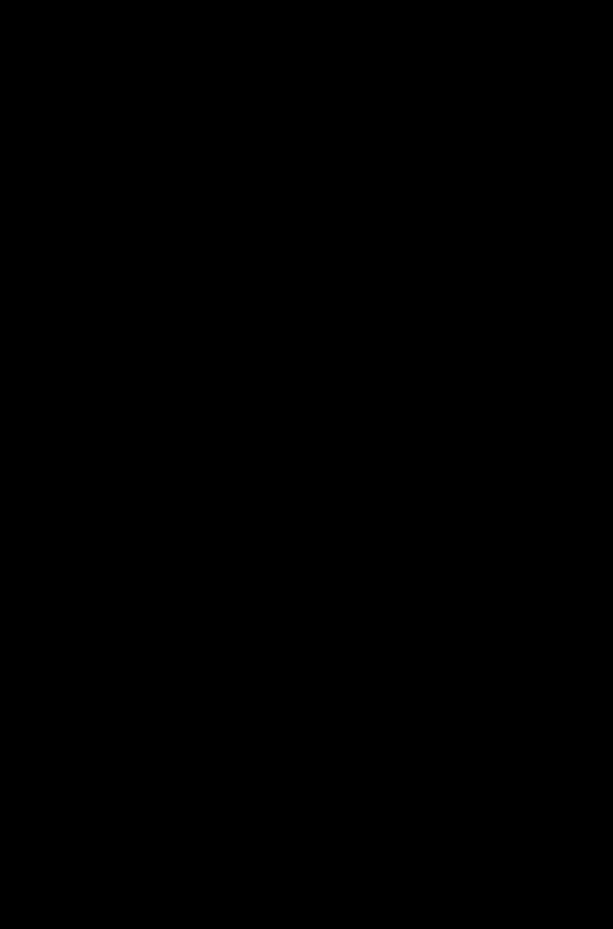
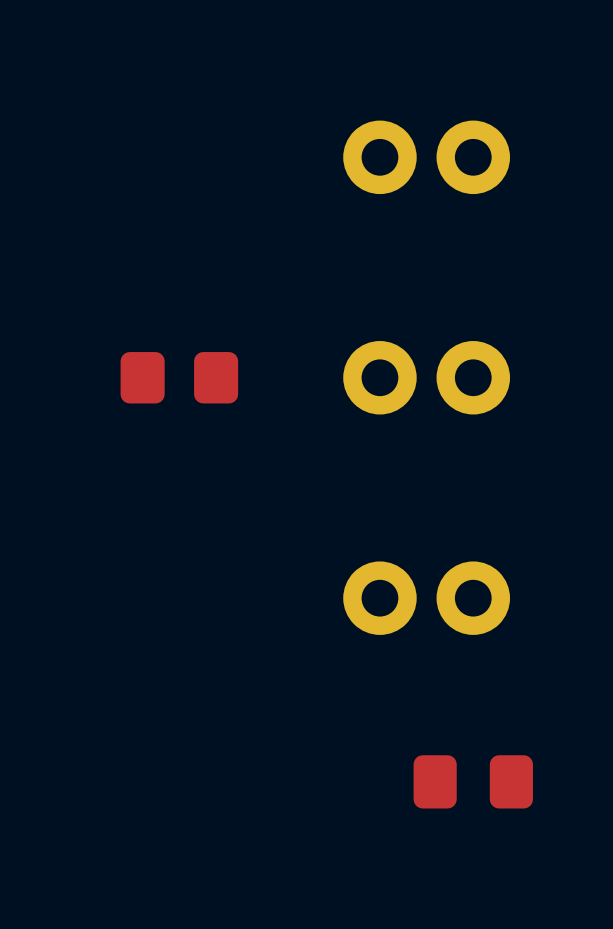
part: none -> (426, 157)
part: none -> (179, 377)
part: none -> (426, 377)
part: none -> (426, 598)
part: none -> (473, 781)

